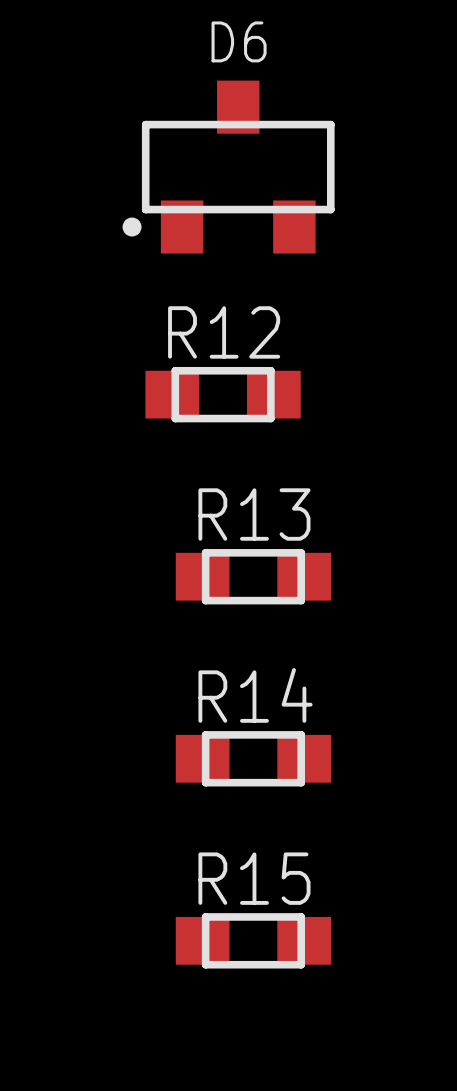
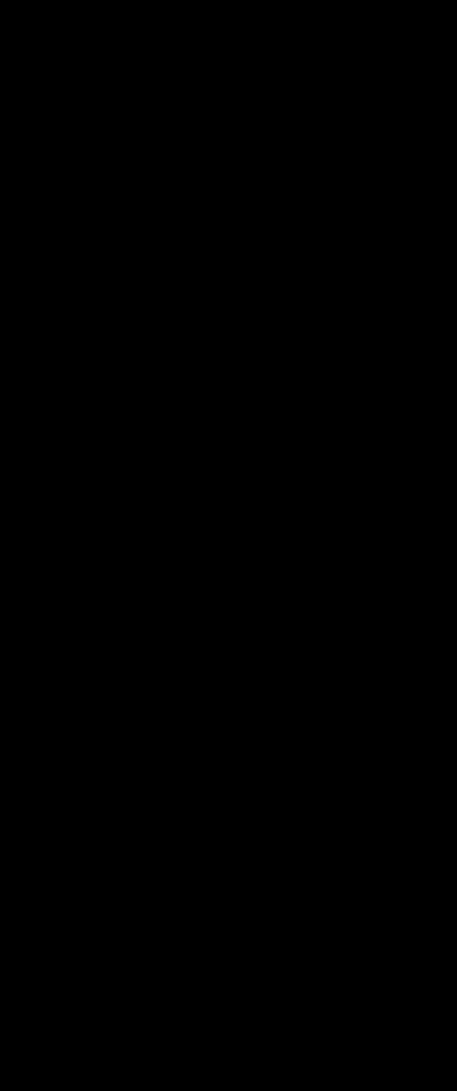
D6: (228, 167) -> none
R12: (223, 394) -> none
R13: (253, 576) -> none
R14: (253, 758) -> none
R15: (253, 940) -> none

